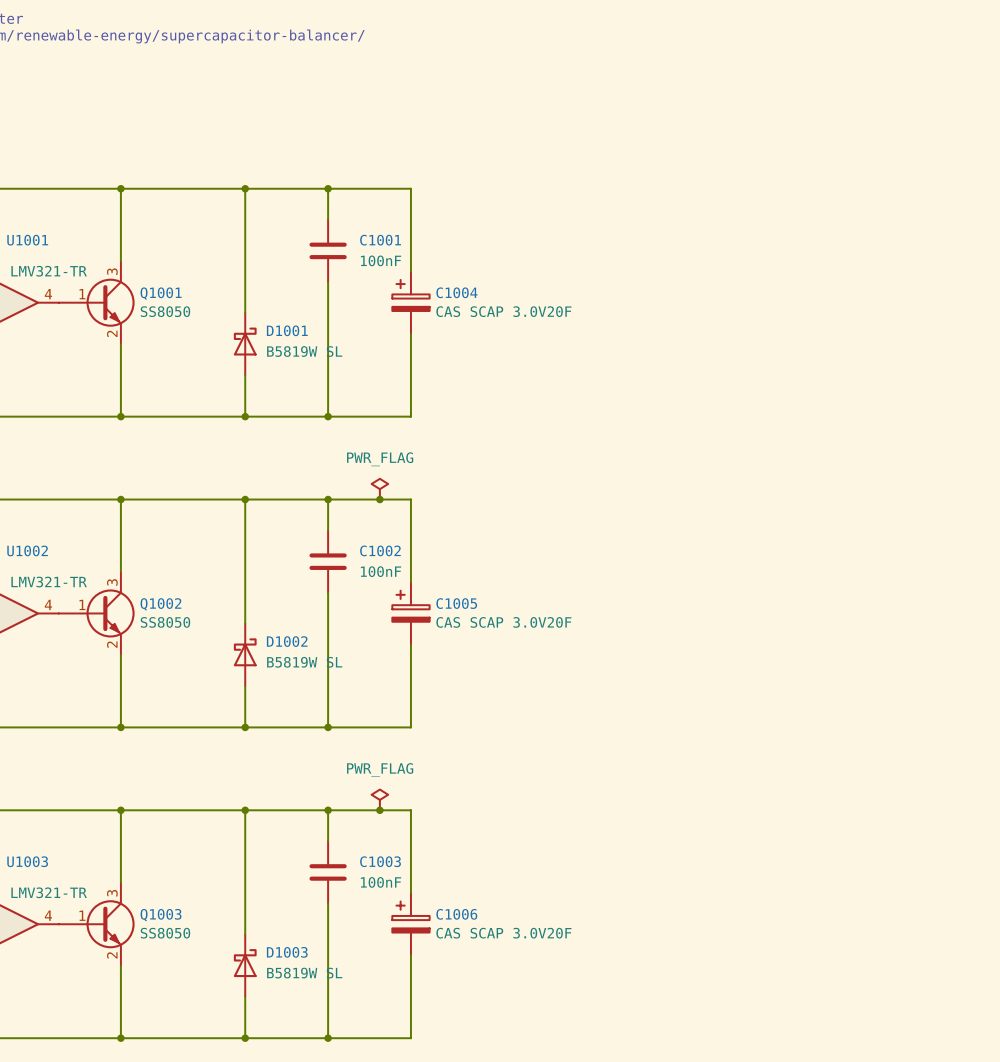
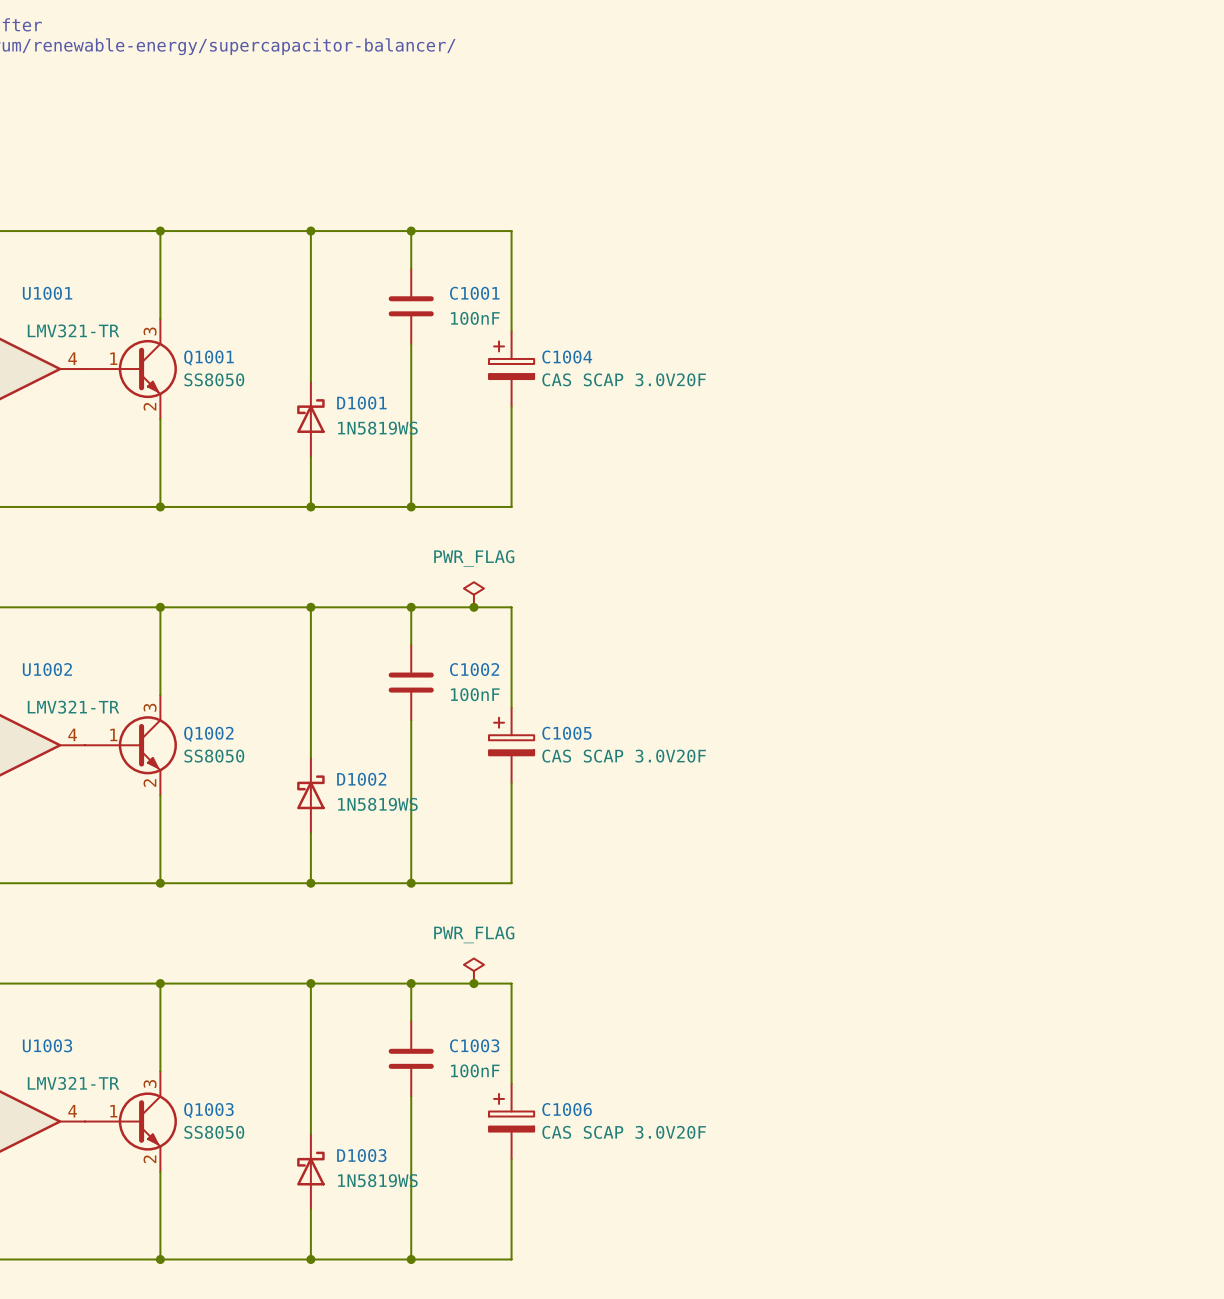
D1001 value: B5819W SL (304, 351) -> 1N5819WS (377, 428)
D1002 value: B5819W SL (304, 662) -> 1N5819WS (377, 804)
D1003 value: B5819W SL (304, 973) -> 1N5819WS (377, 1180)

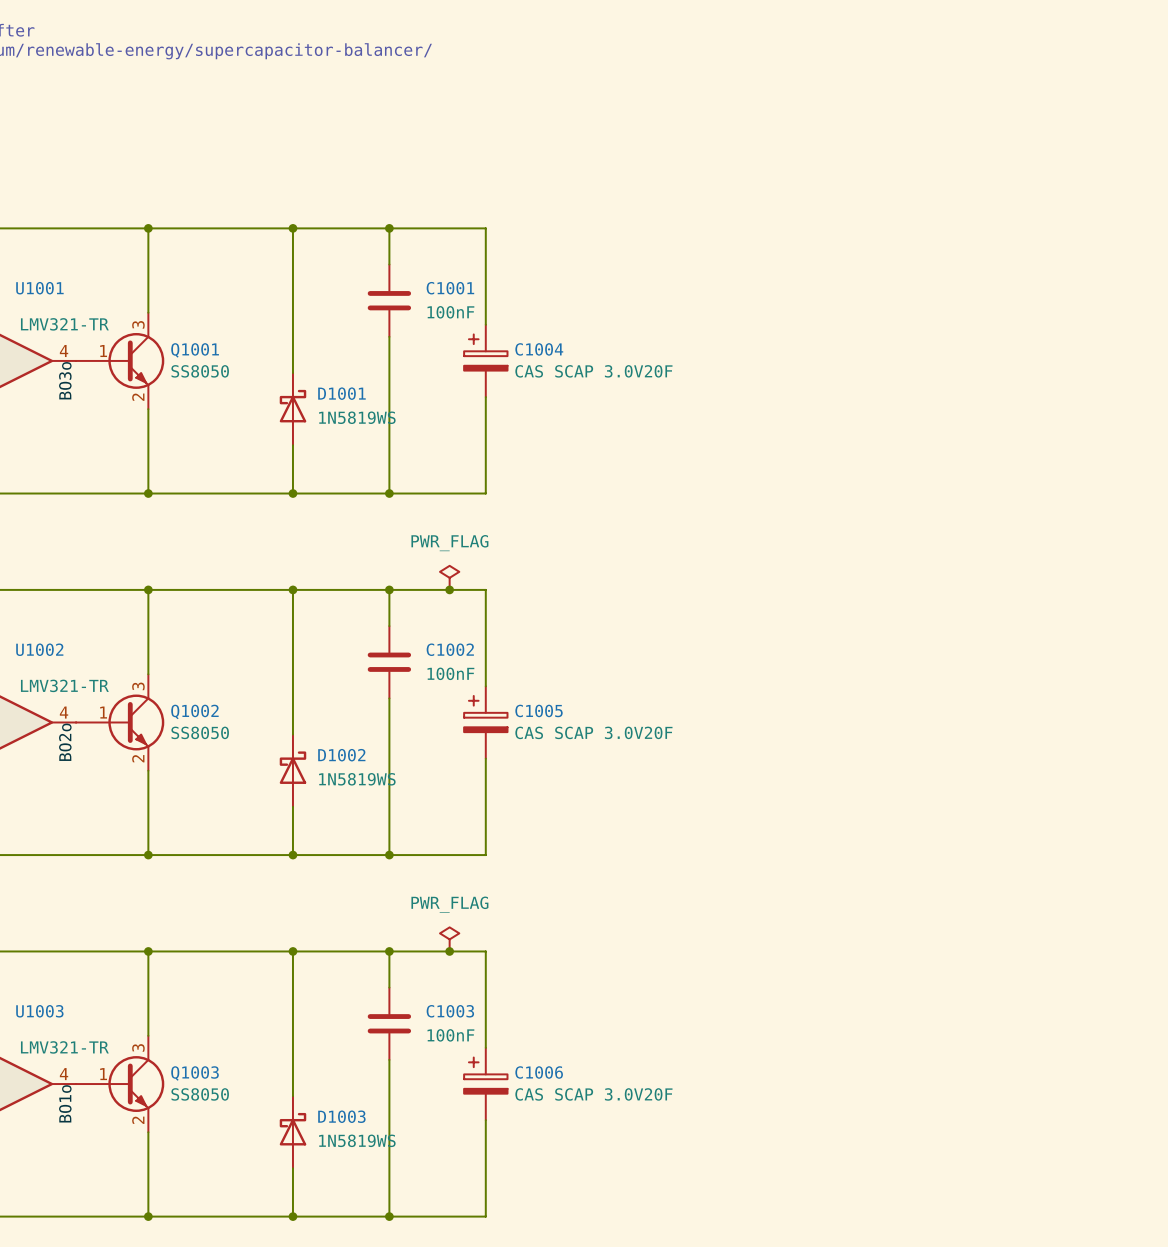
label: none -> BO3o (65, 380)
label: none -> BO2o (65, 742)
label: none -> BO1o (65, 1103)

